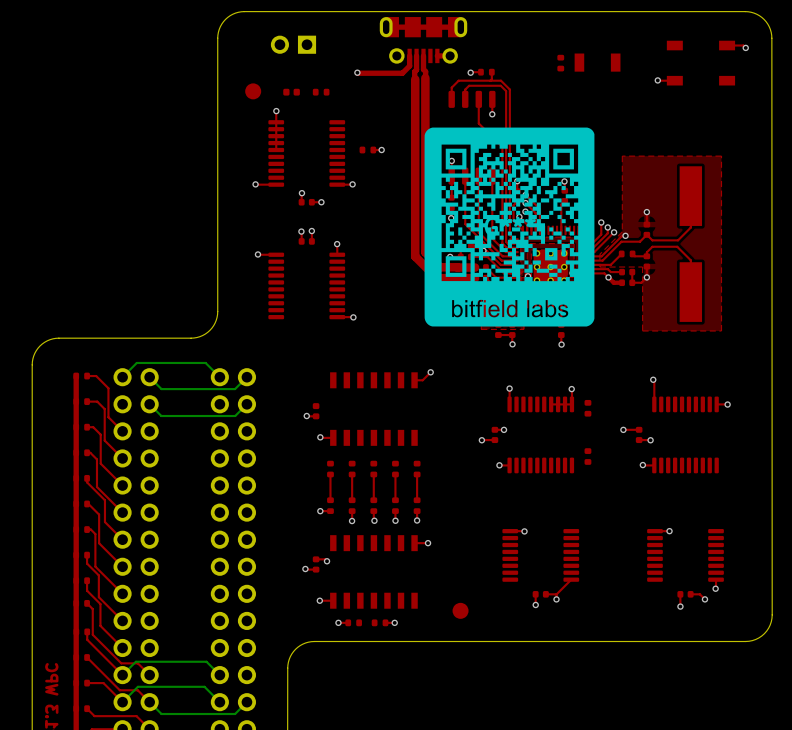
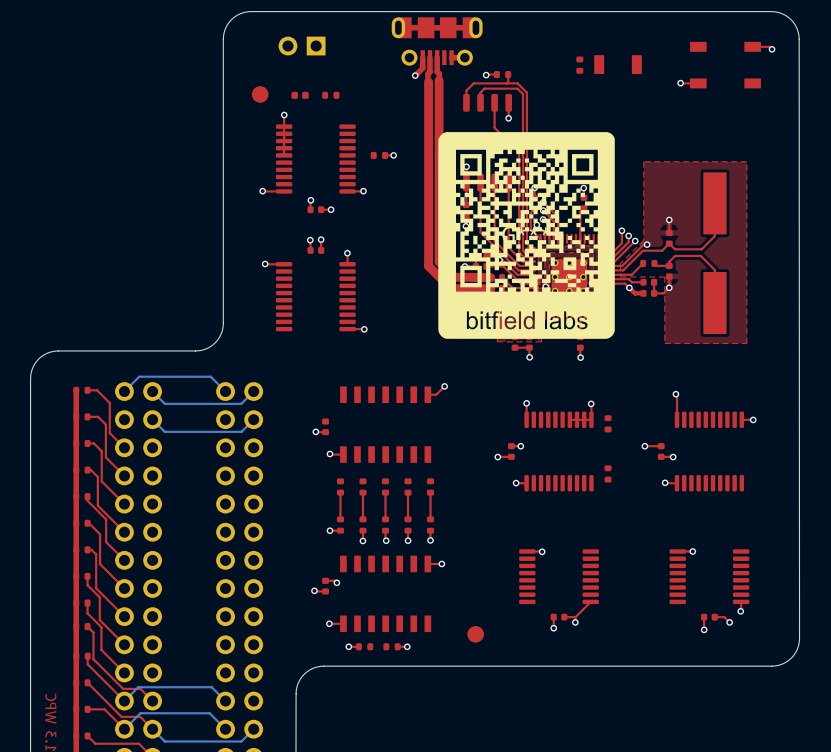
top track: (357, 72) (402, 73) -> none
via position: (357, 72) -> (415, 75)

